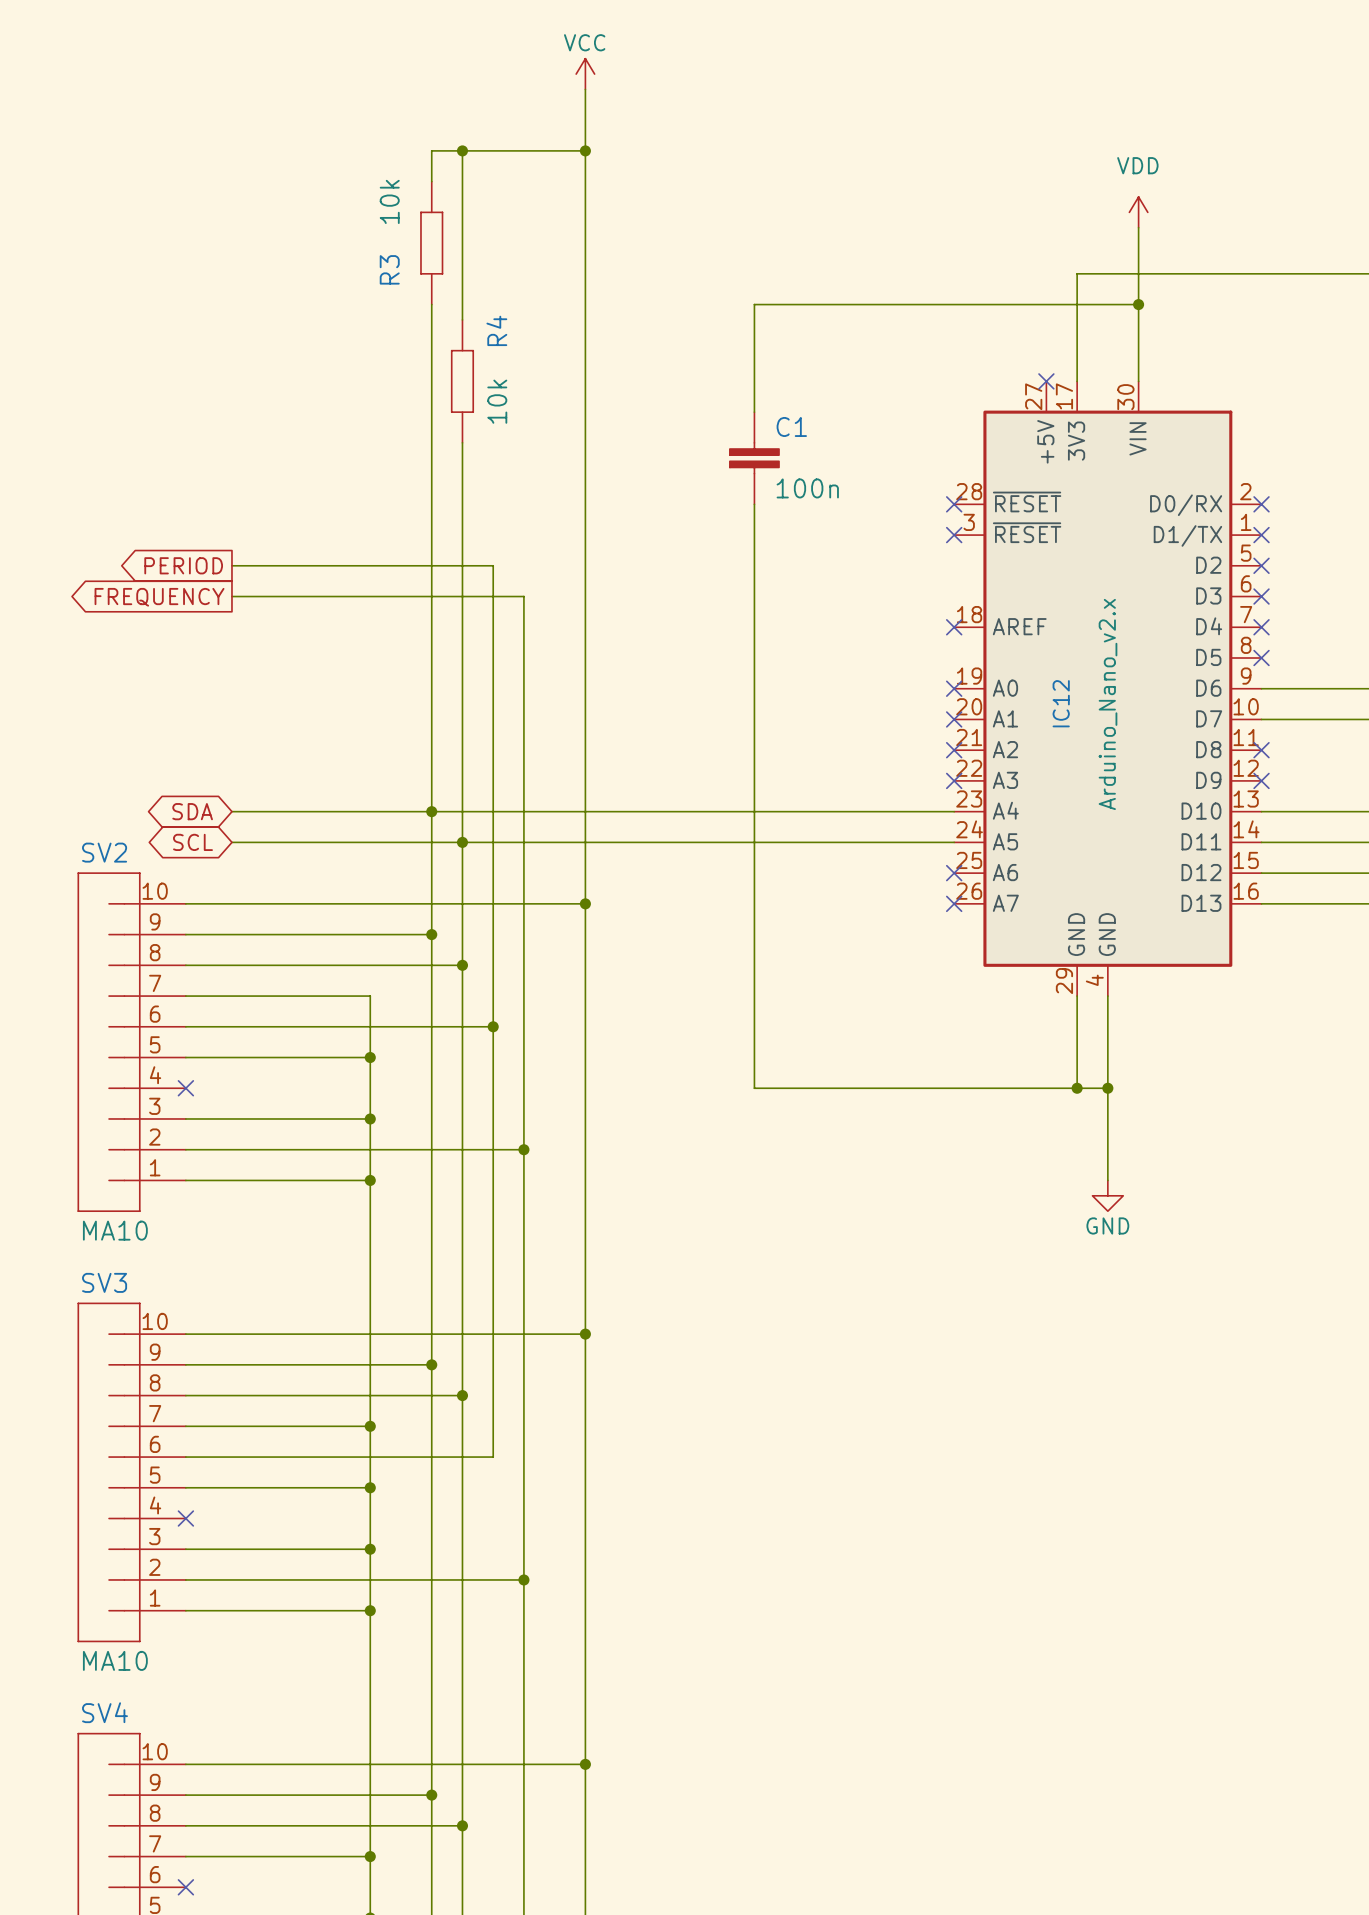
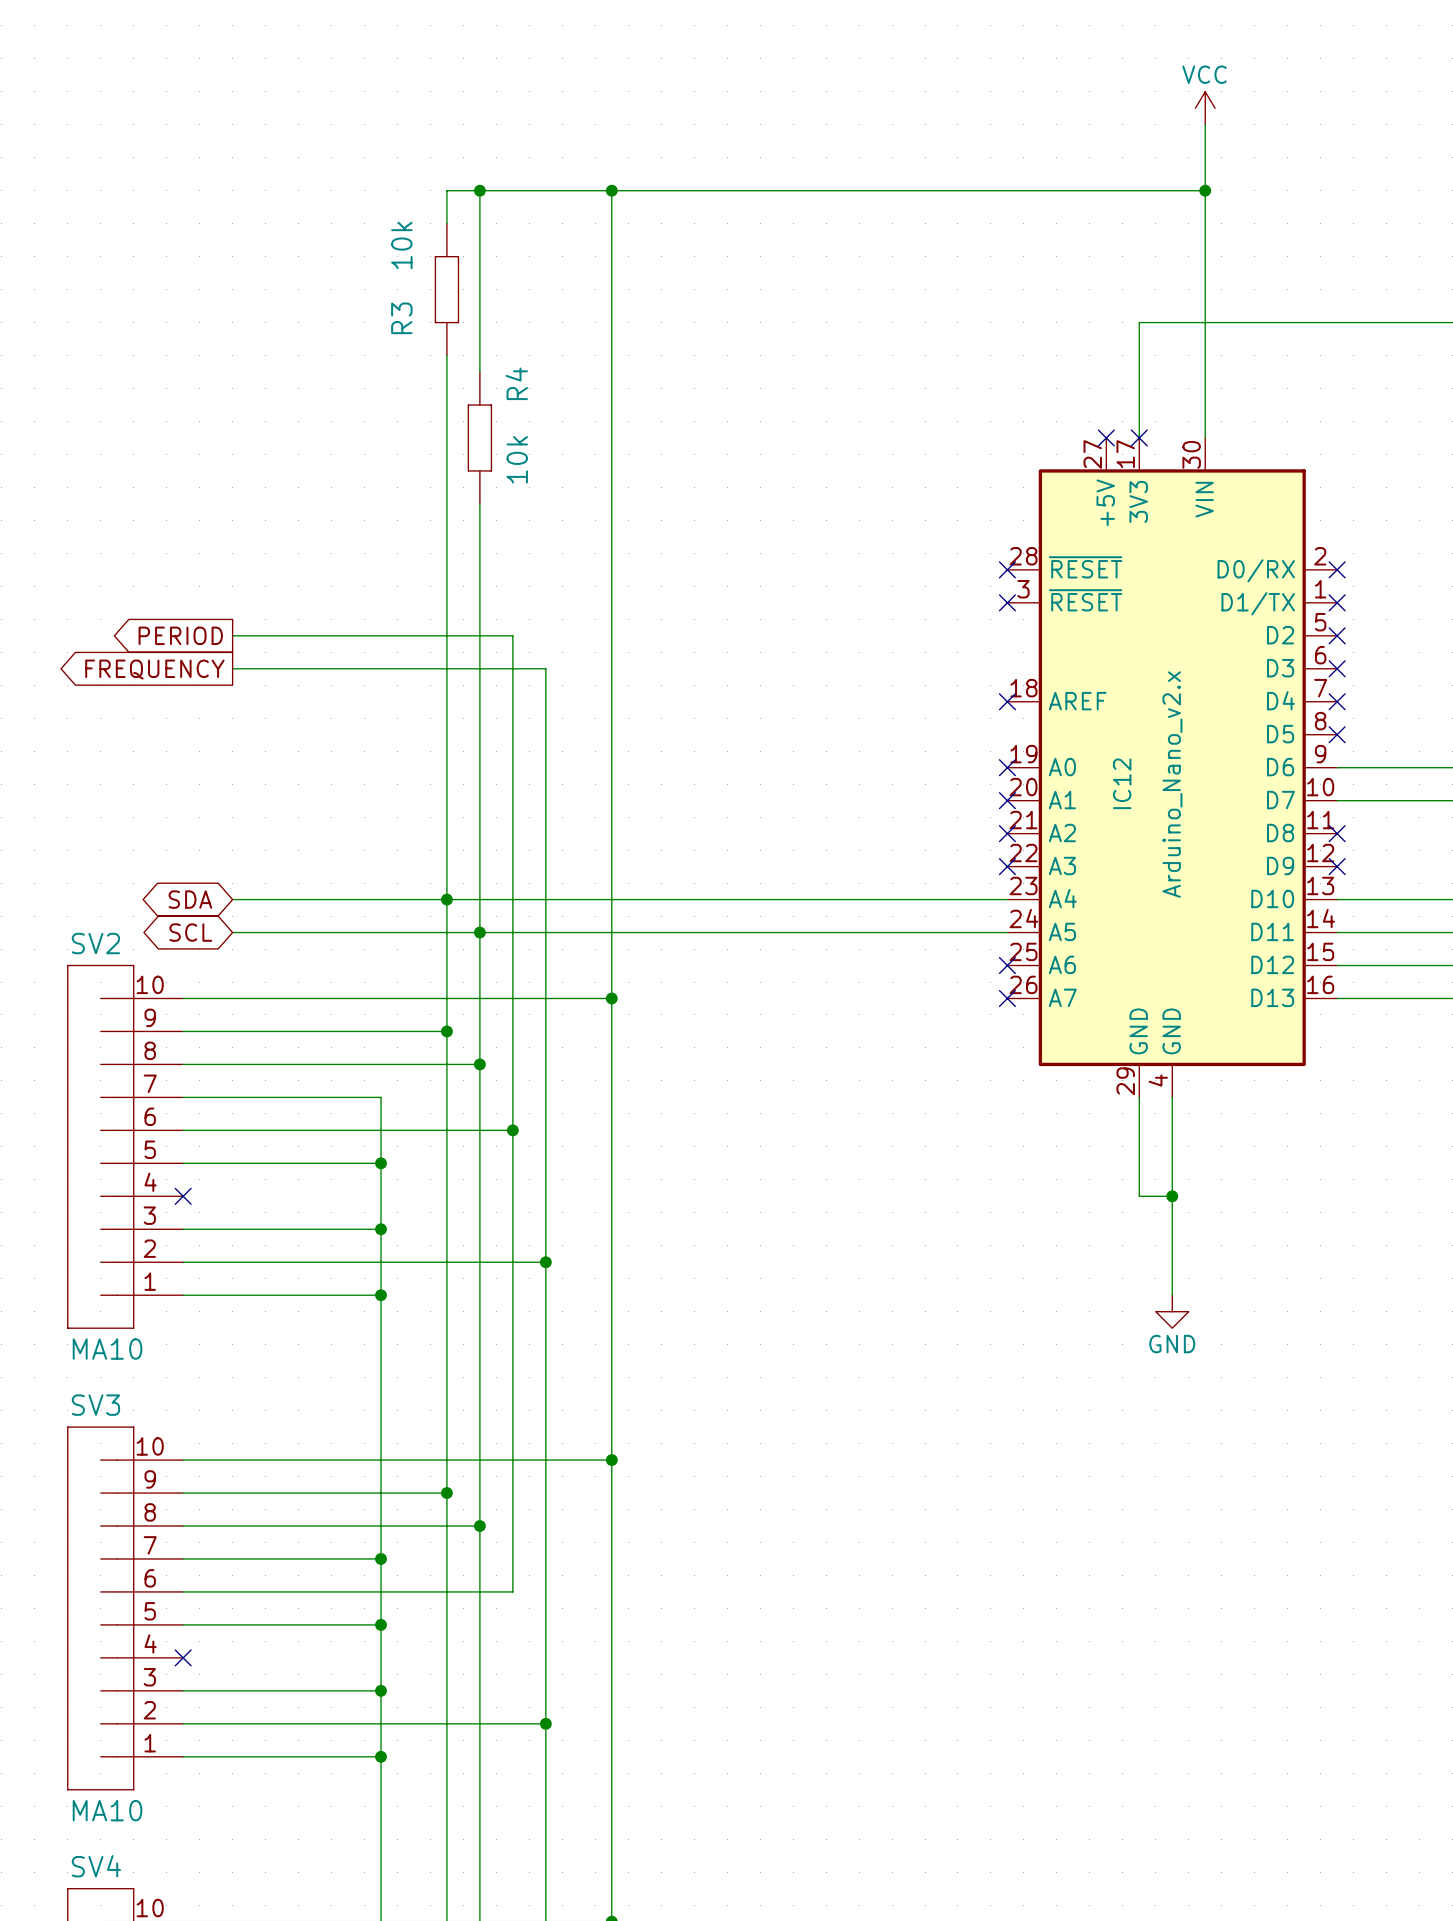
power symbol: VCC (585, 74) -> none
power symbol: none -> VCC (1205, 108)
wire: (585, 89) (585, 150) -> (1205, 190) (611, 190)
wire: none -> (1205, 124) (1205, 273)
junction: none -> (1205, 190)
power symbol: VDD (1138, 212) -> none
wire: (1138, 304) (754, 304) (754, 412) -> none
junction: (1138, 304) -> none
no-connect mark: none -> (1139, 437)
C1: 100n (754, 458) -> none
wire: (754, 504) (754, 1088) (1077, 1088) -> none
junction: (1077, 1088) -> none

